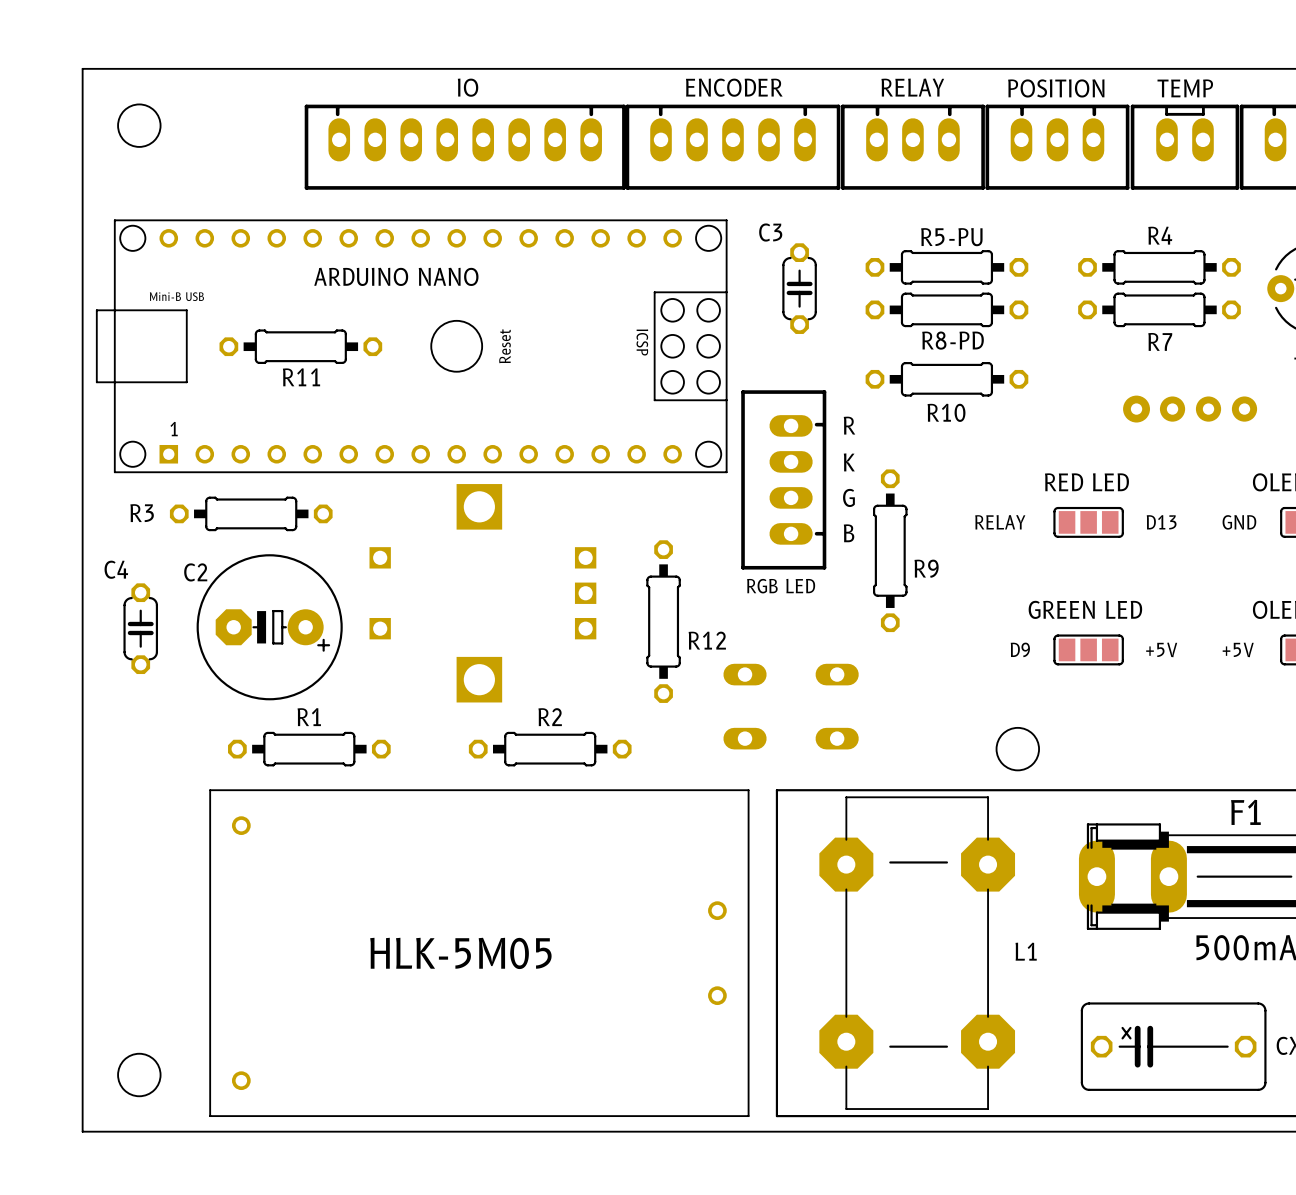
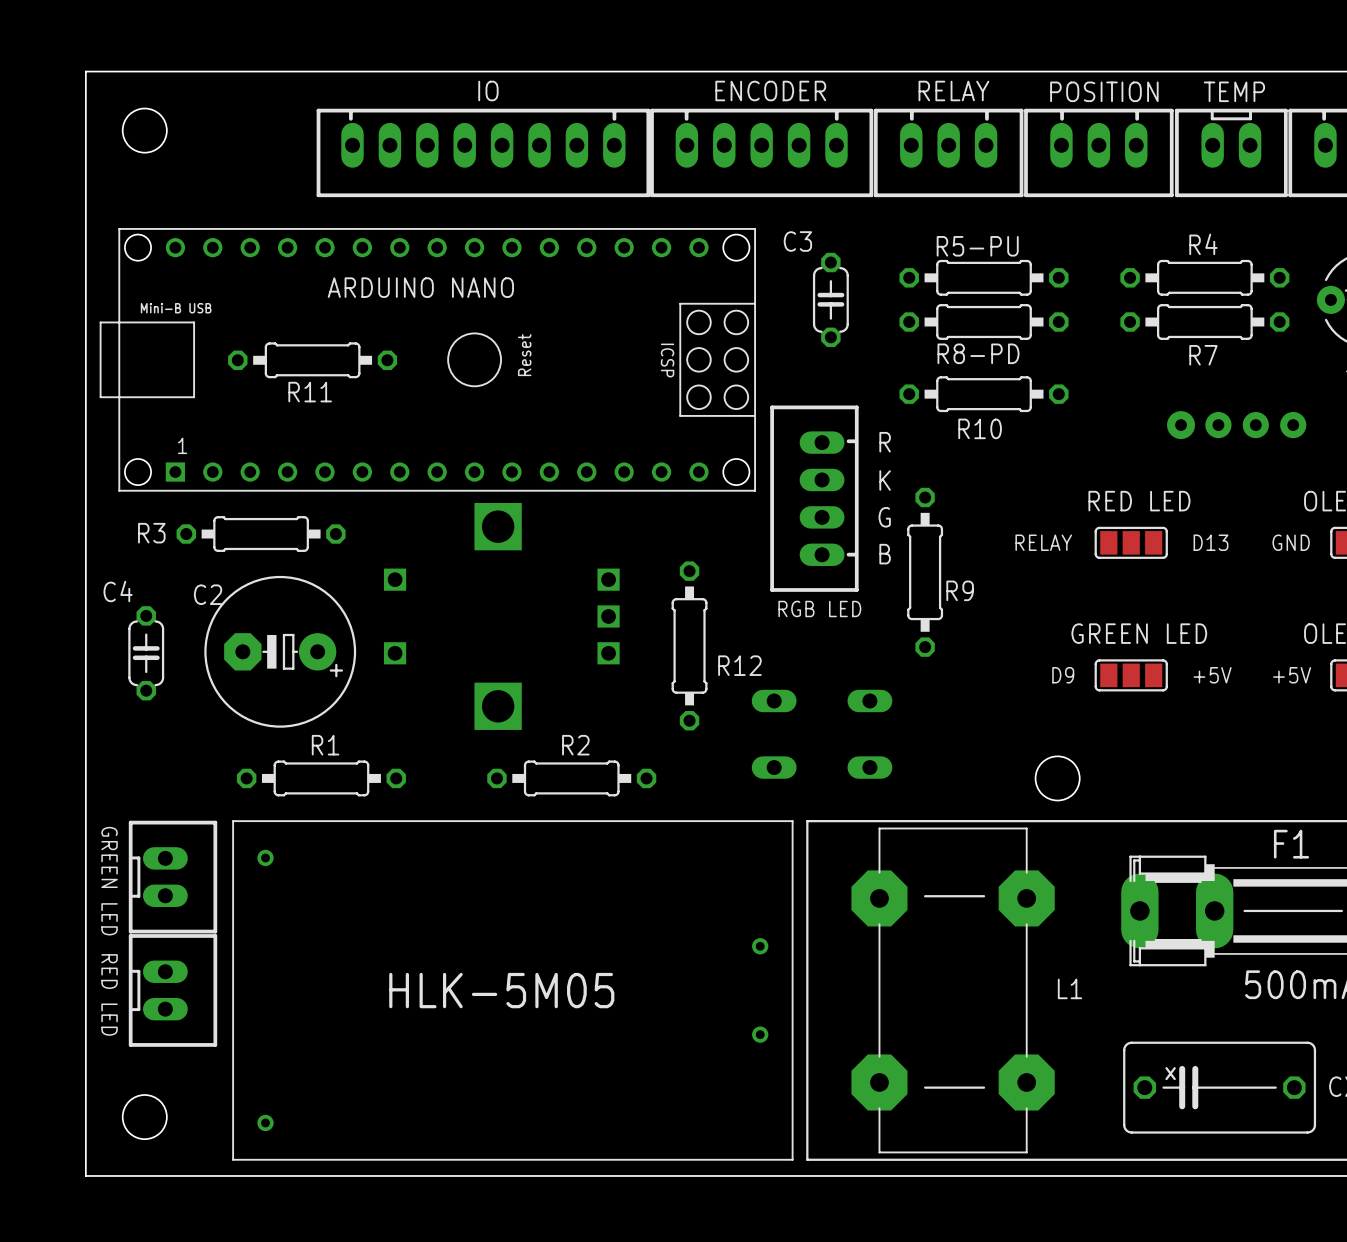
part footprint: [209, 789, 750, 1117] -> [232, 820, 794, 1161]
text: none -> GREEN LED (109, 881)
part: none -> (173, 877)
text: none -> RED LED (109, 994)
part: none -> (173, 990)

